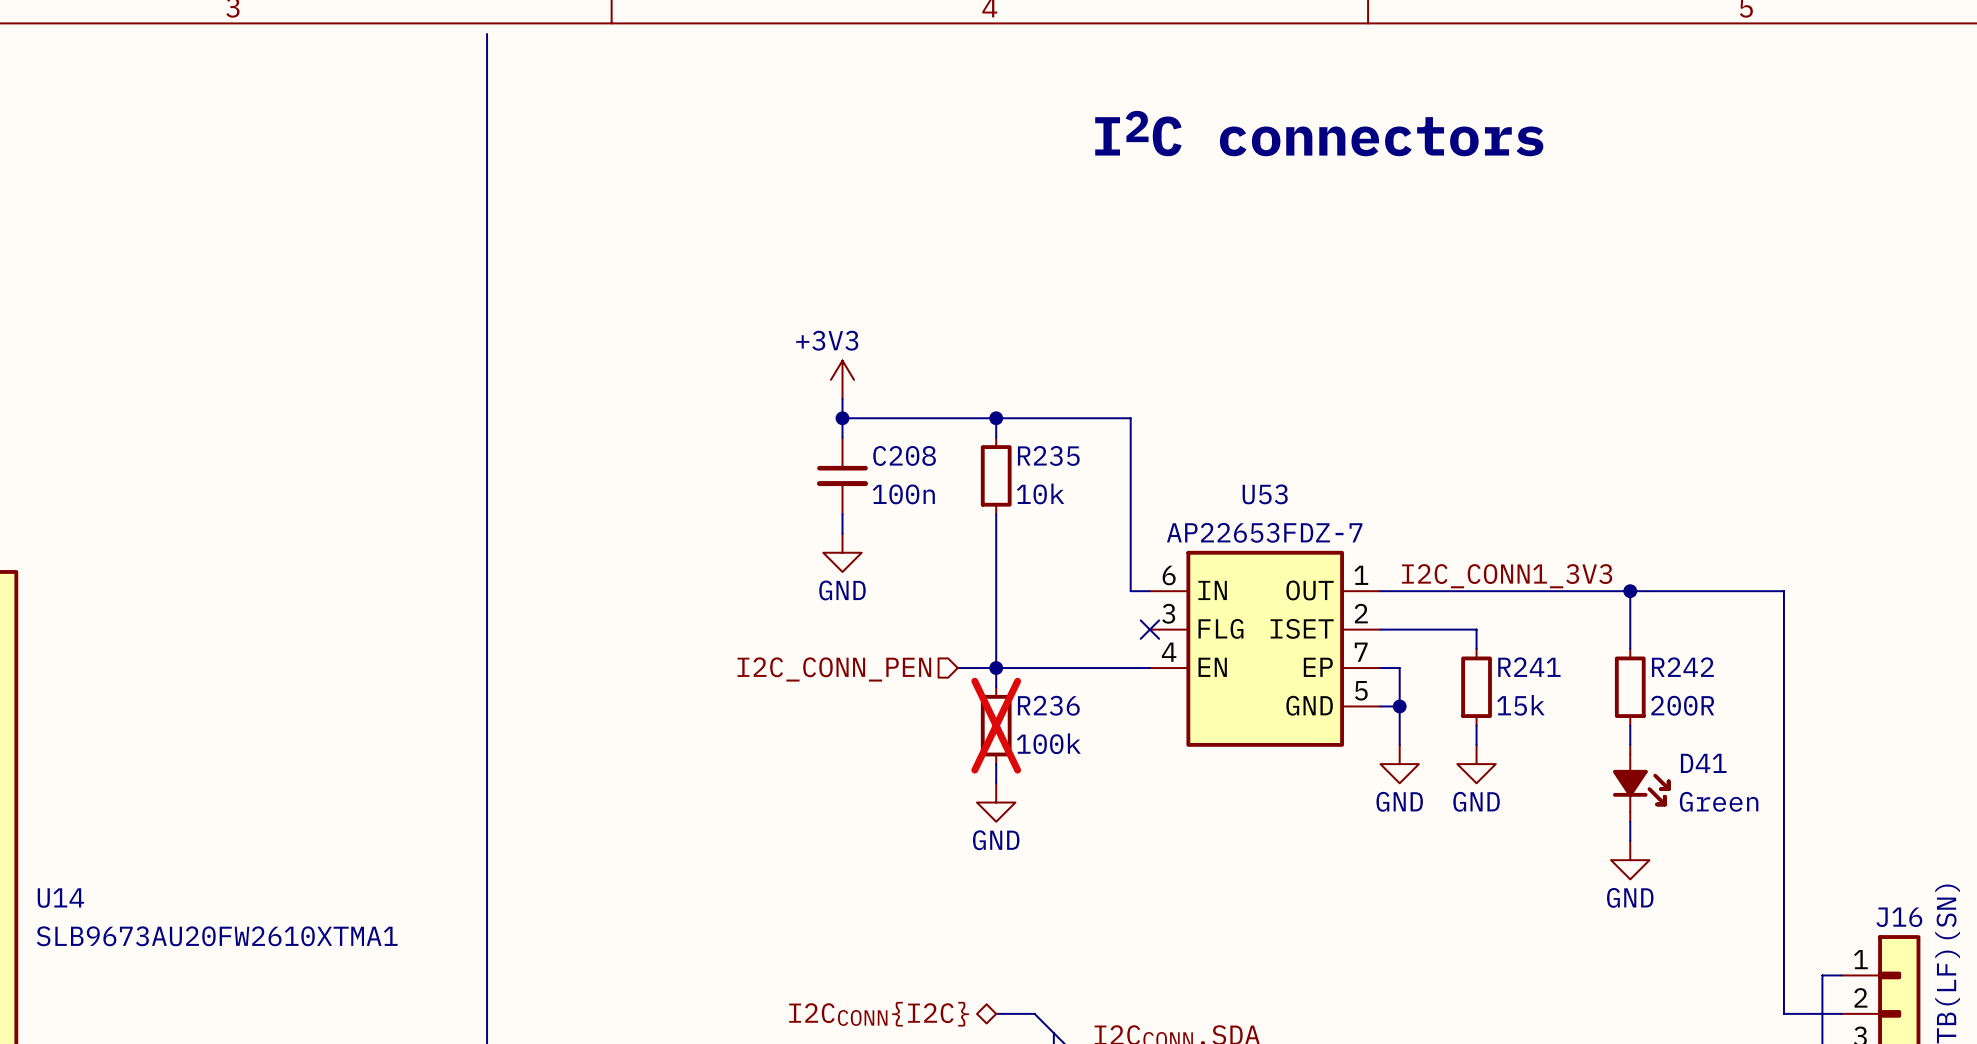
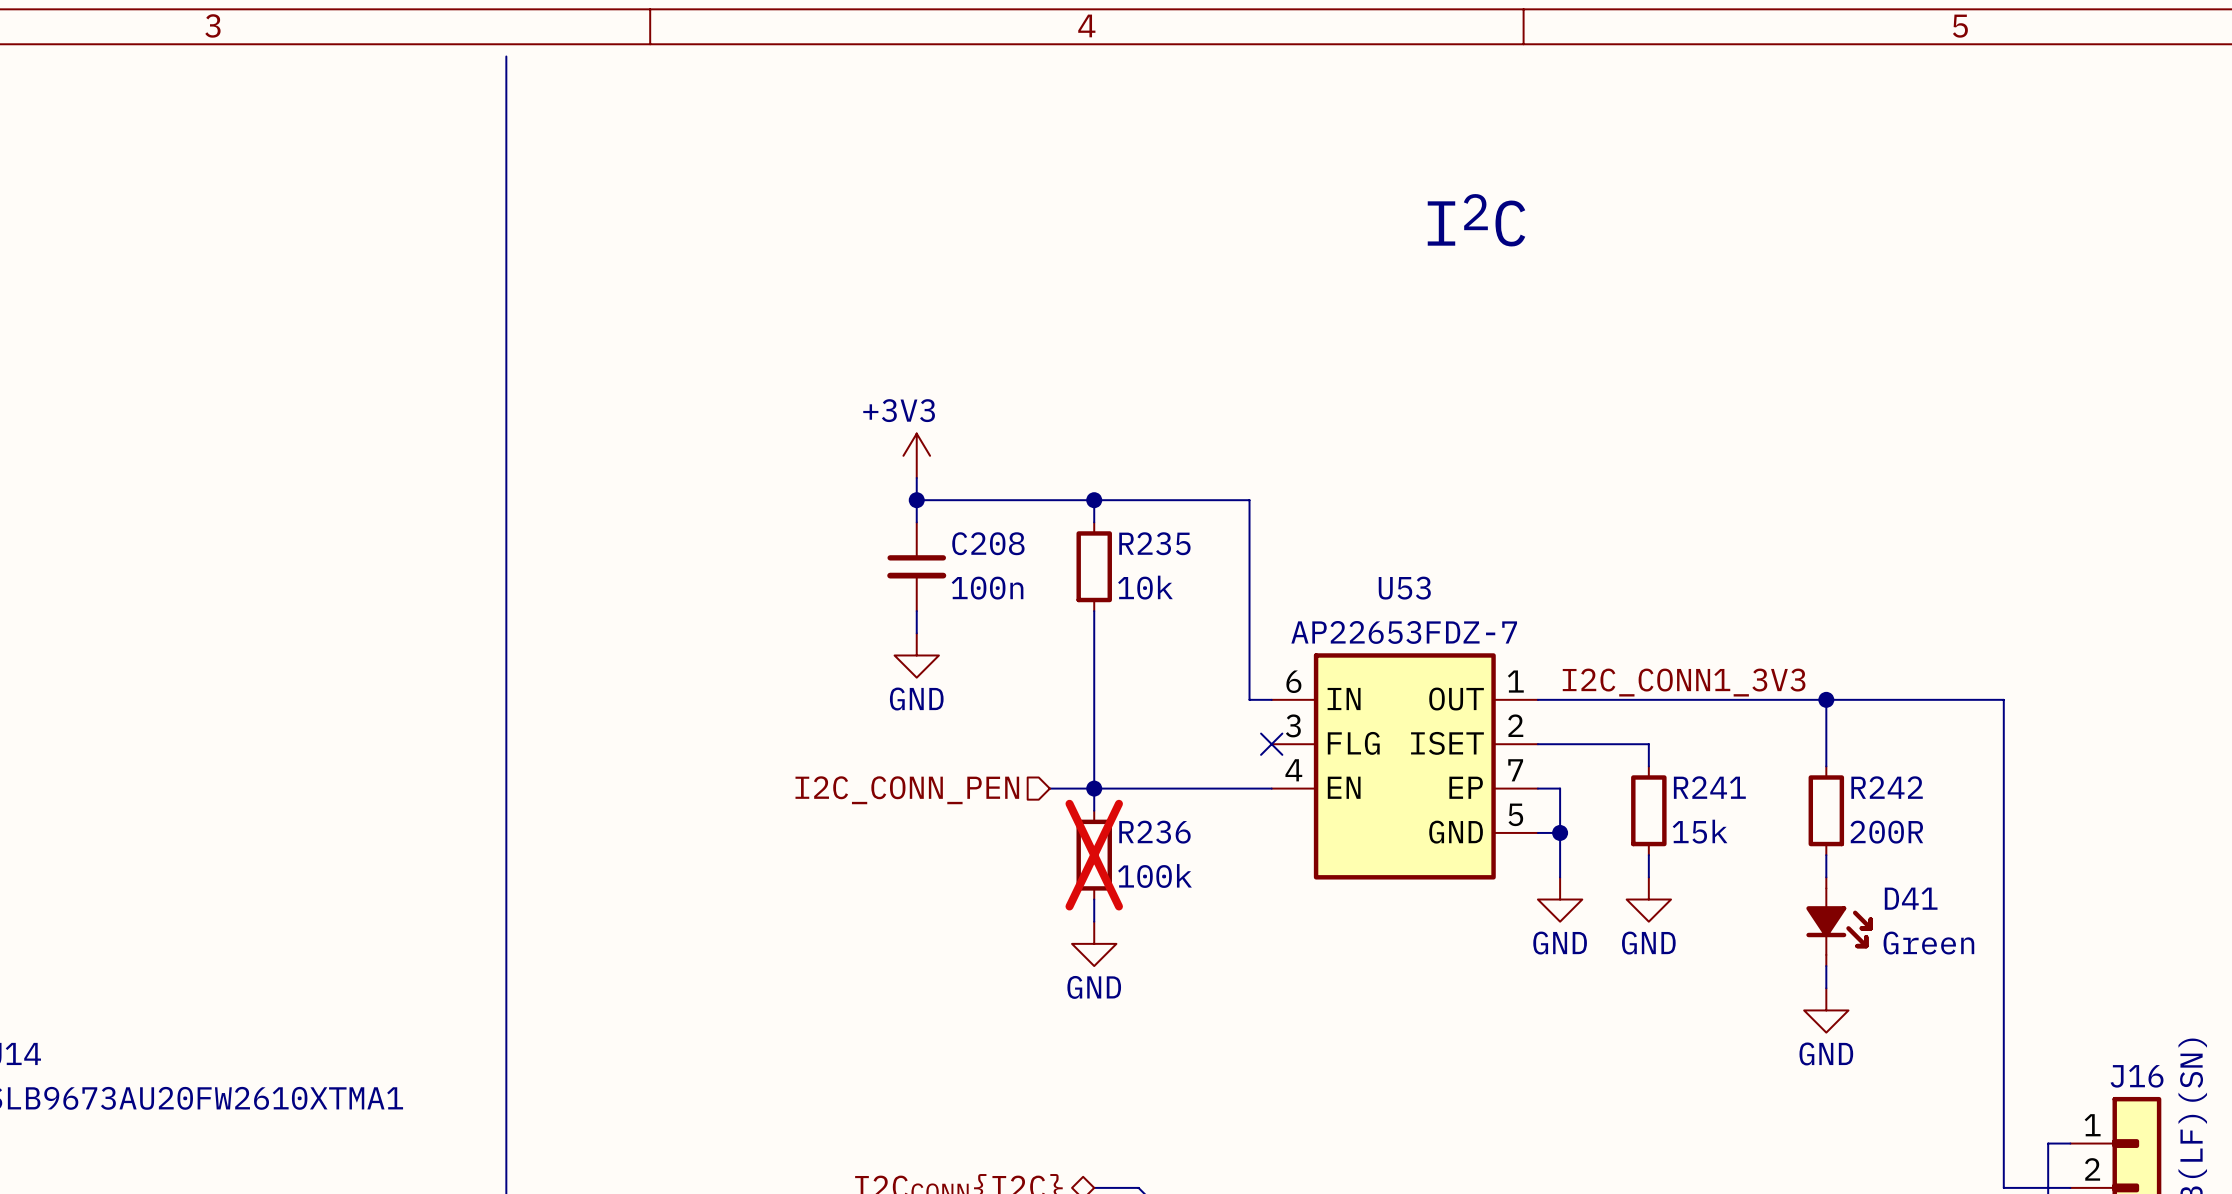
text: I2C connectors (1319, 133) -> none
text: none -> I2C (1476, 220)

